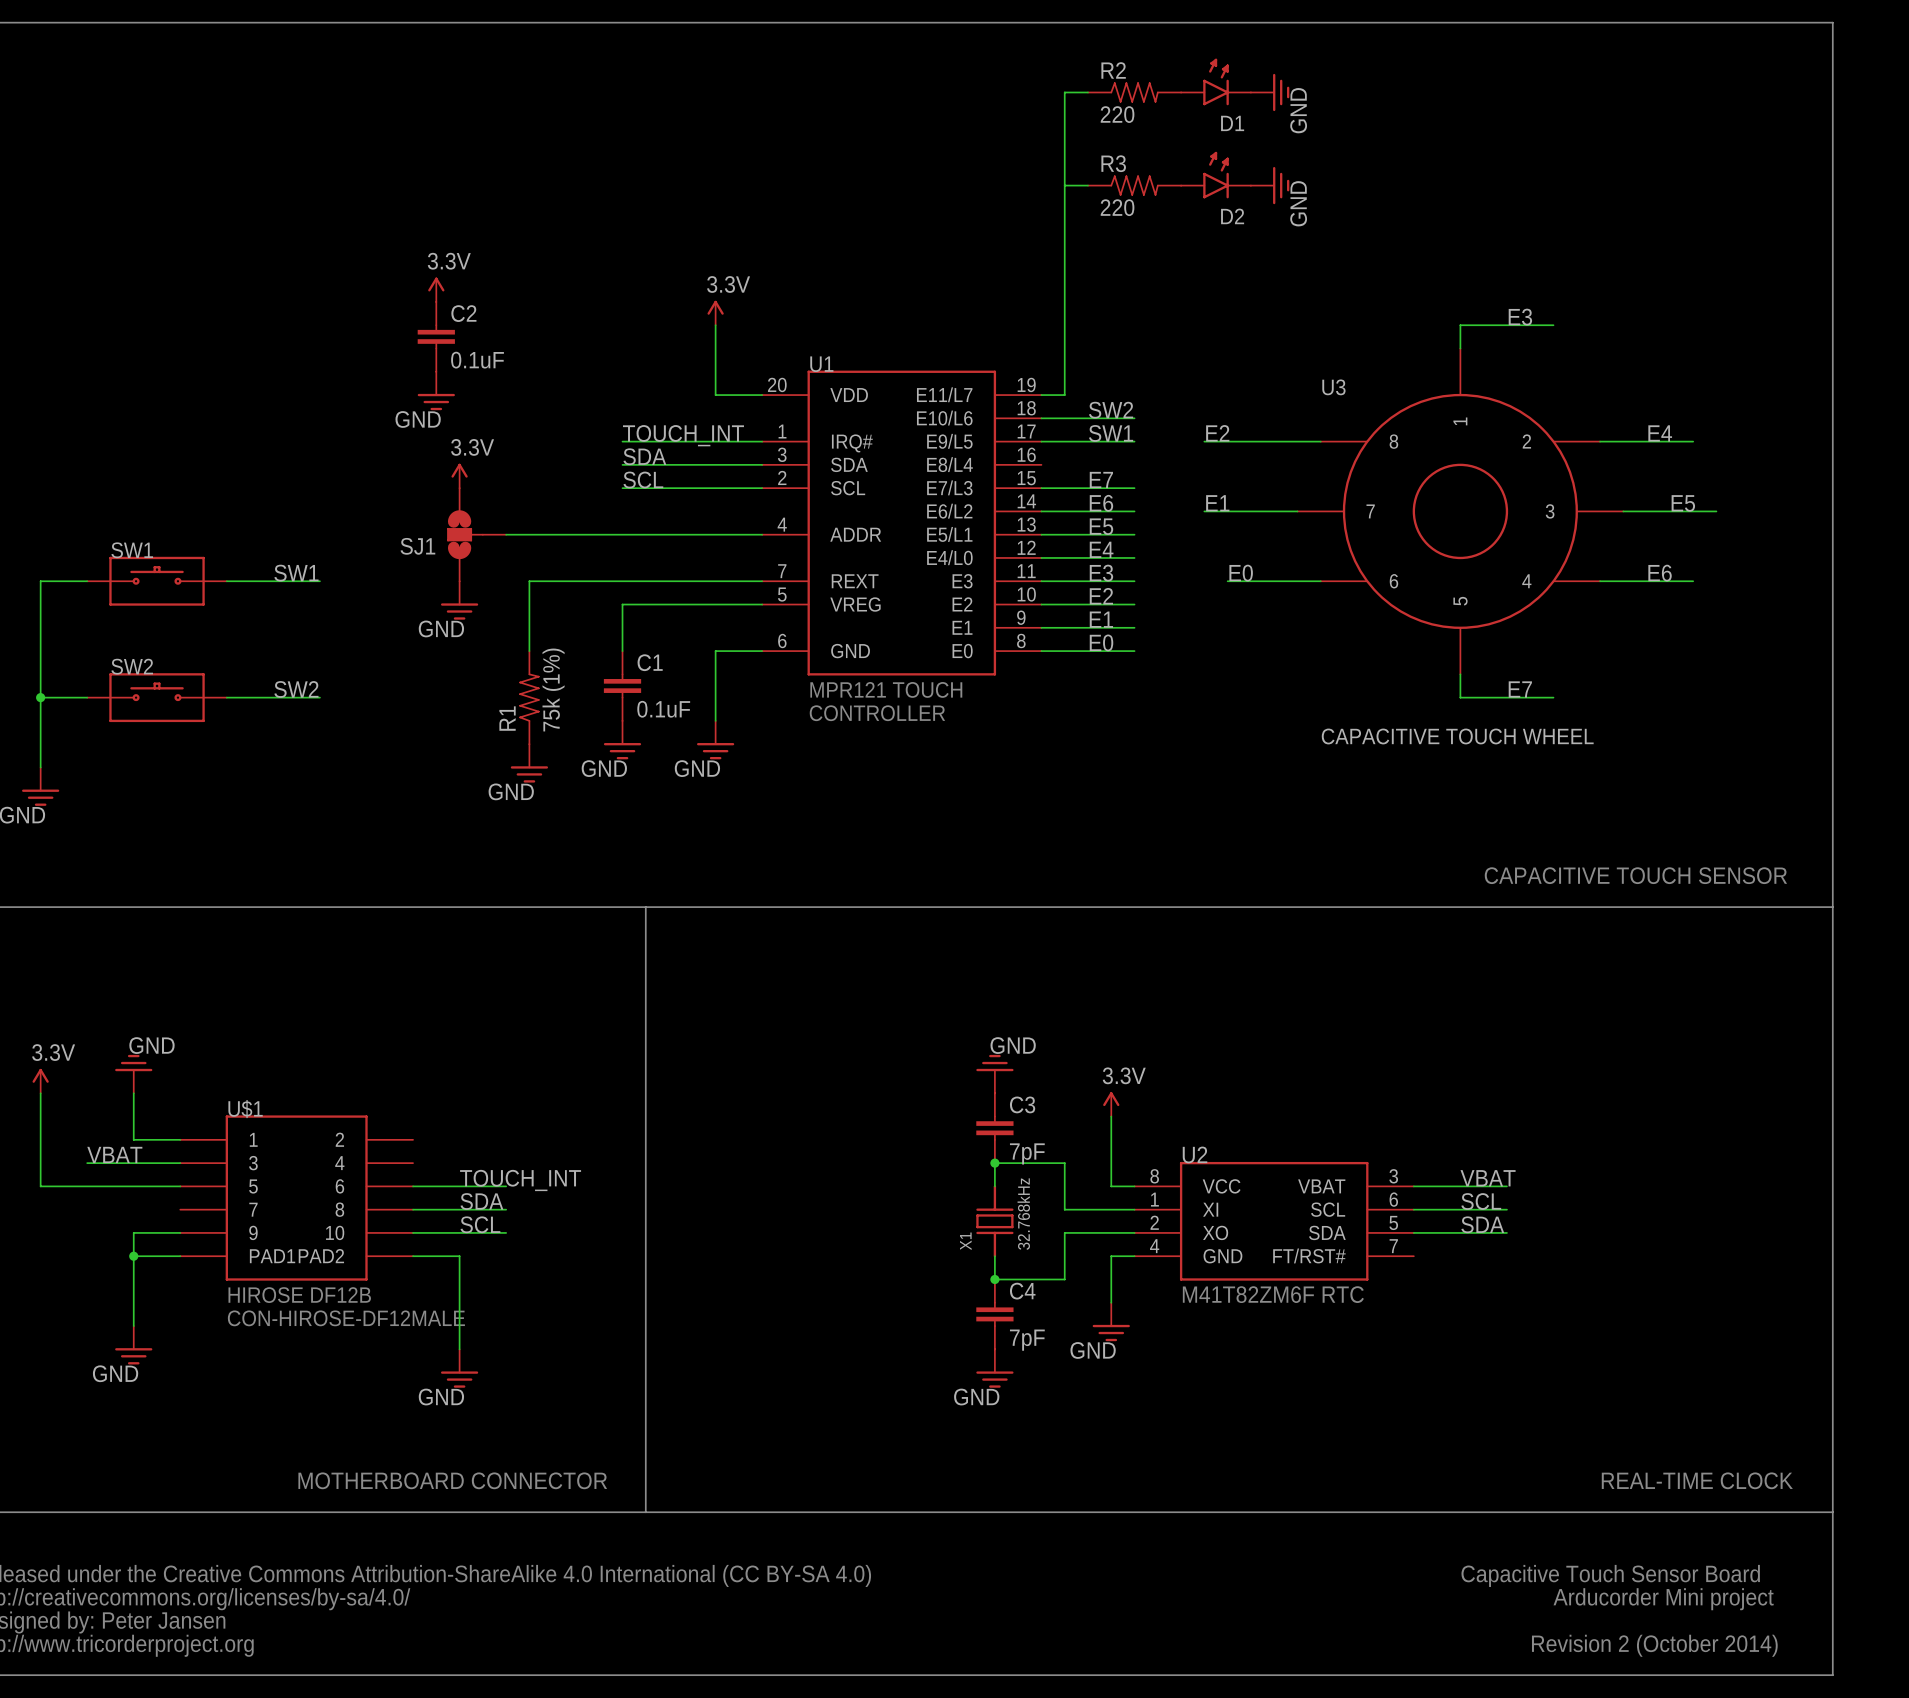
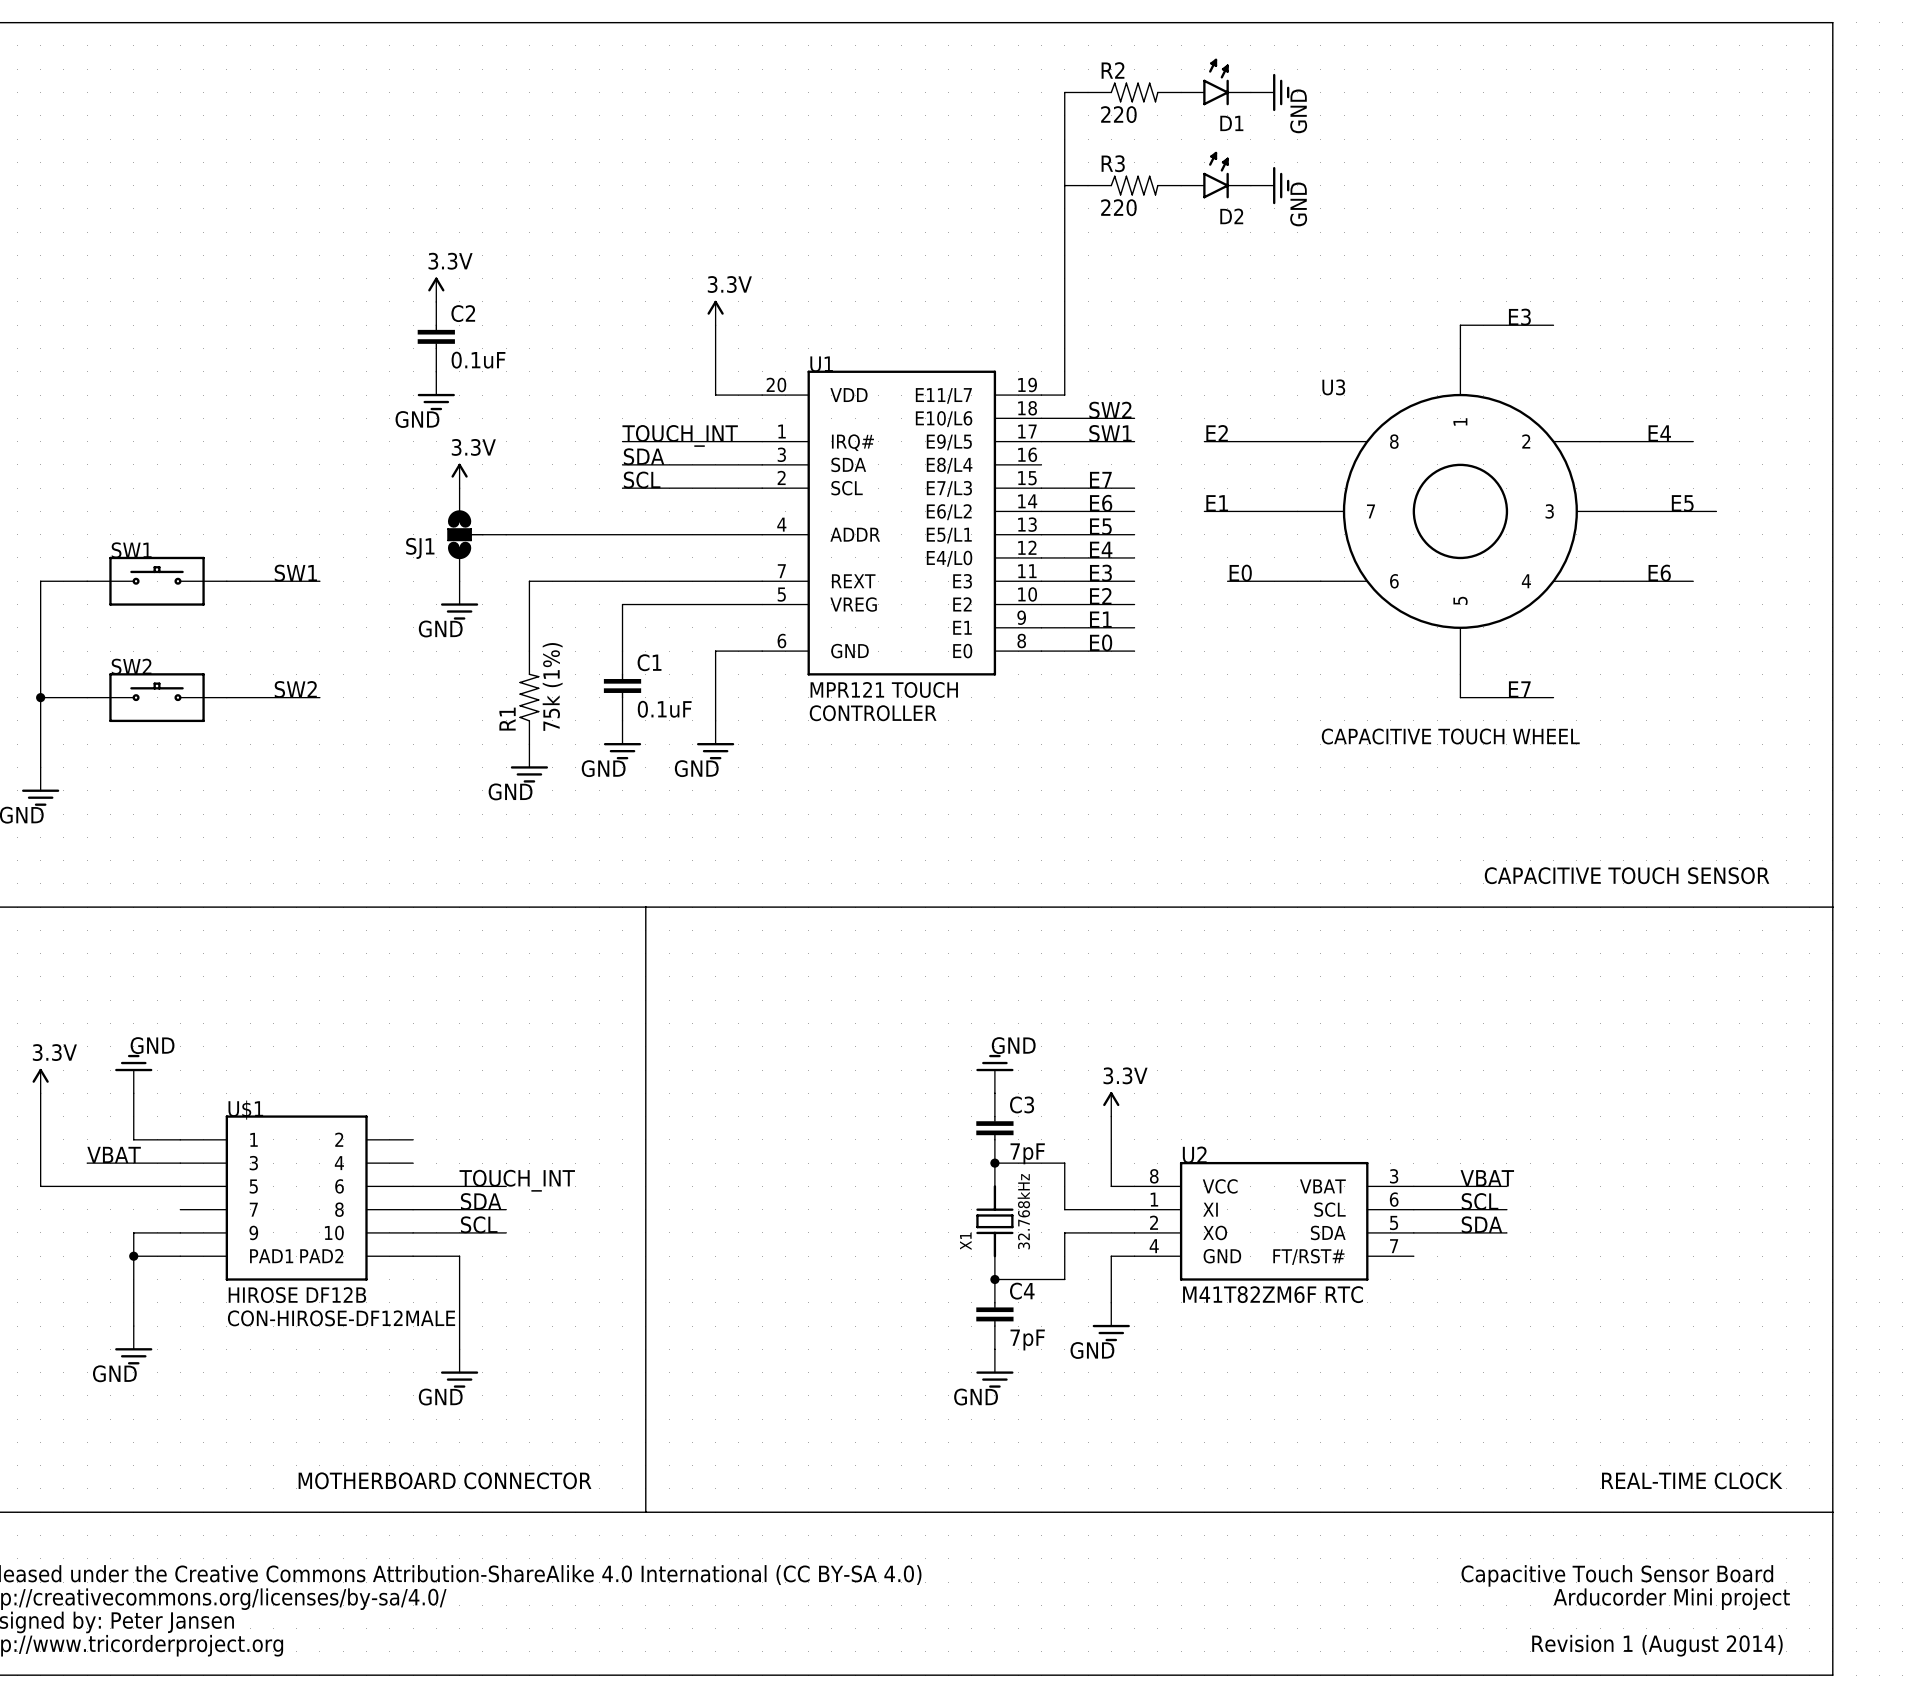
text: Revision 2 (October 2014) (1654, 1645) -> Revision 1 (August 2014) (1657, 1645)

